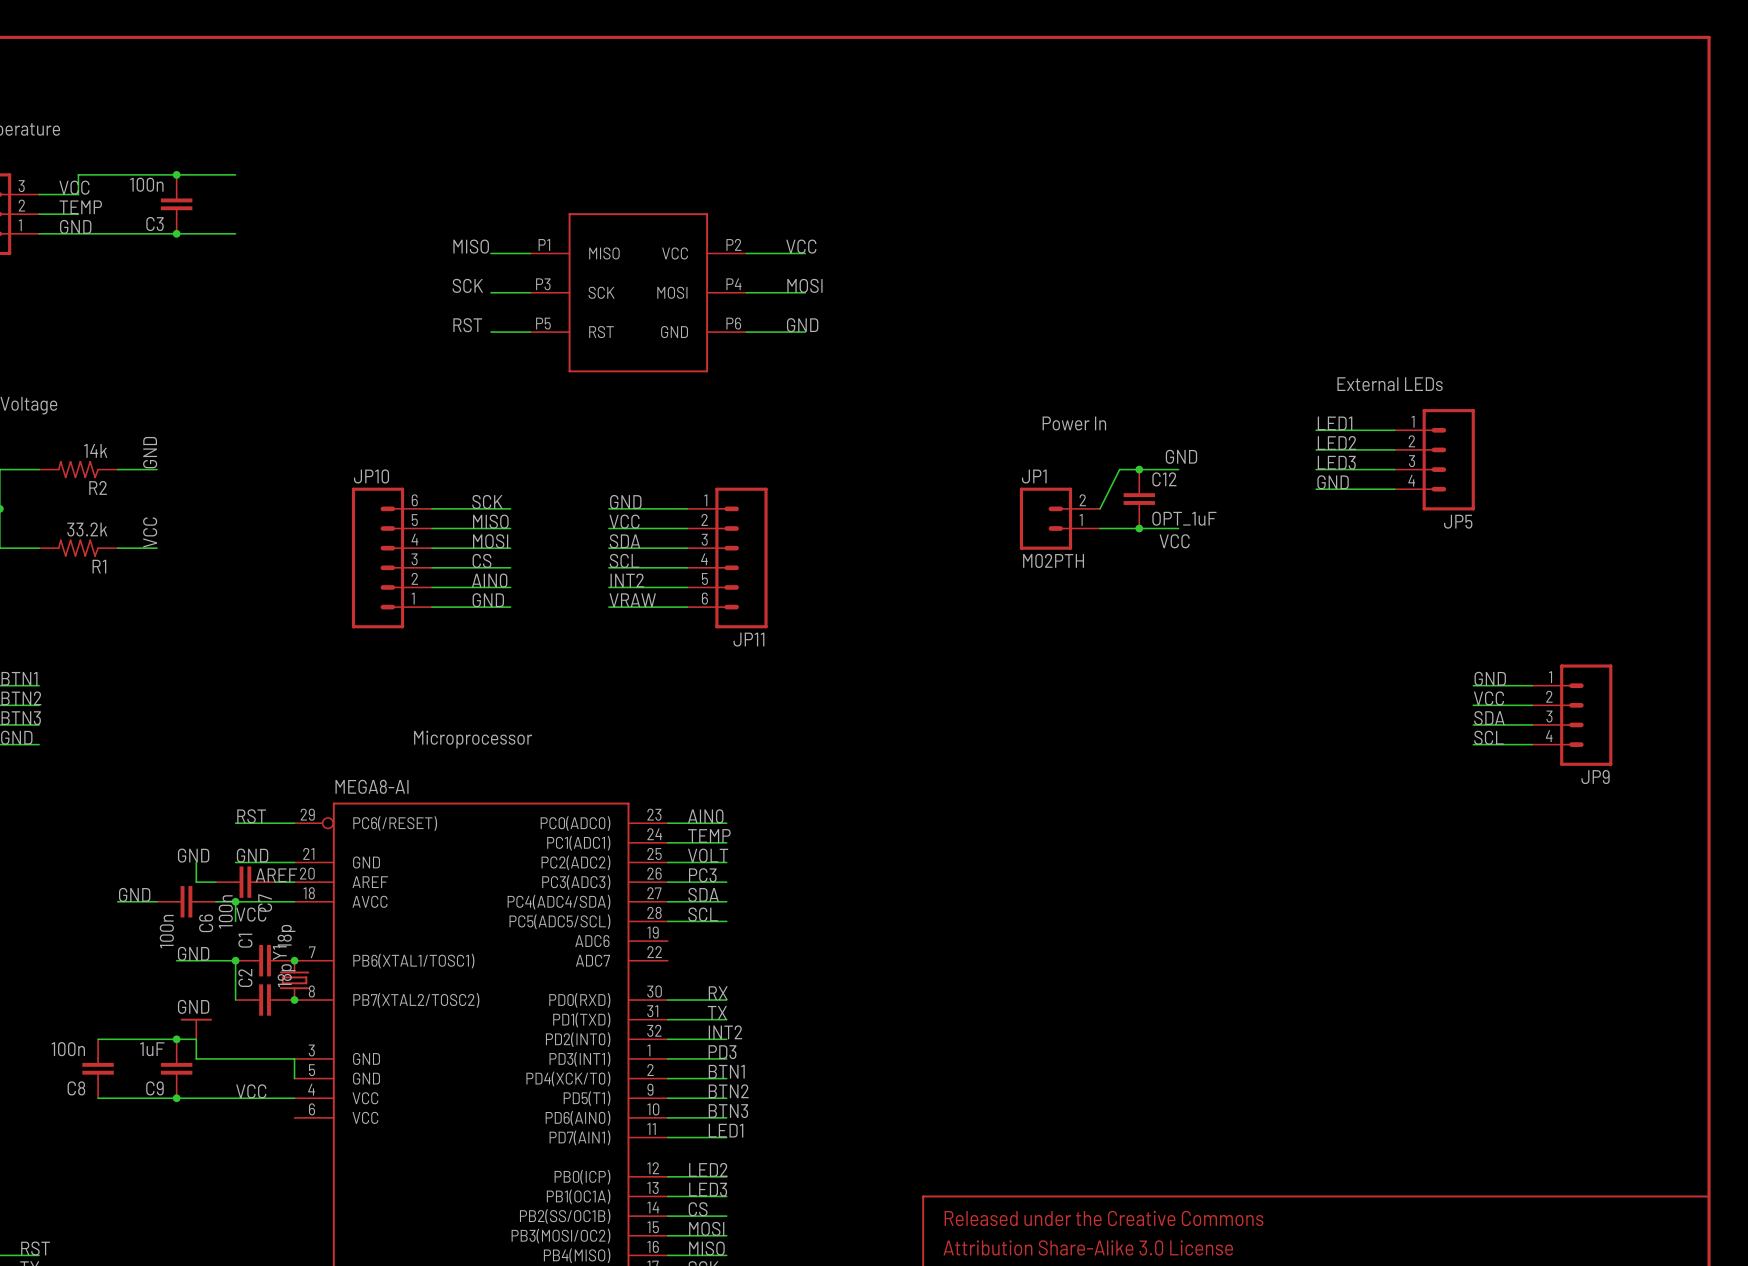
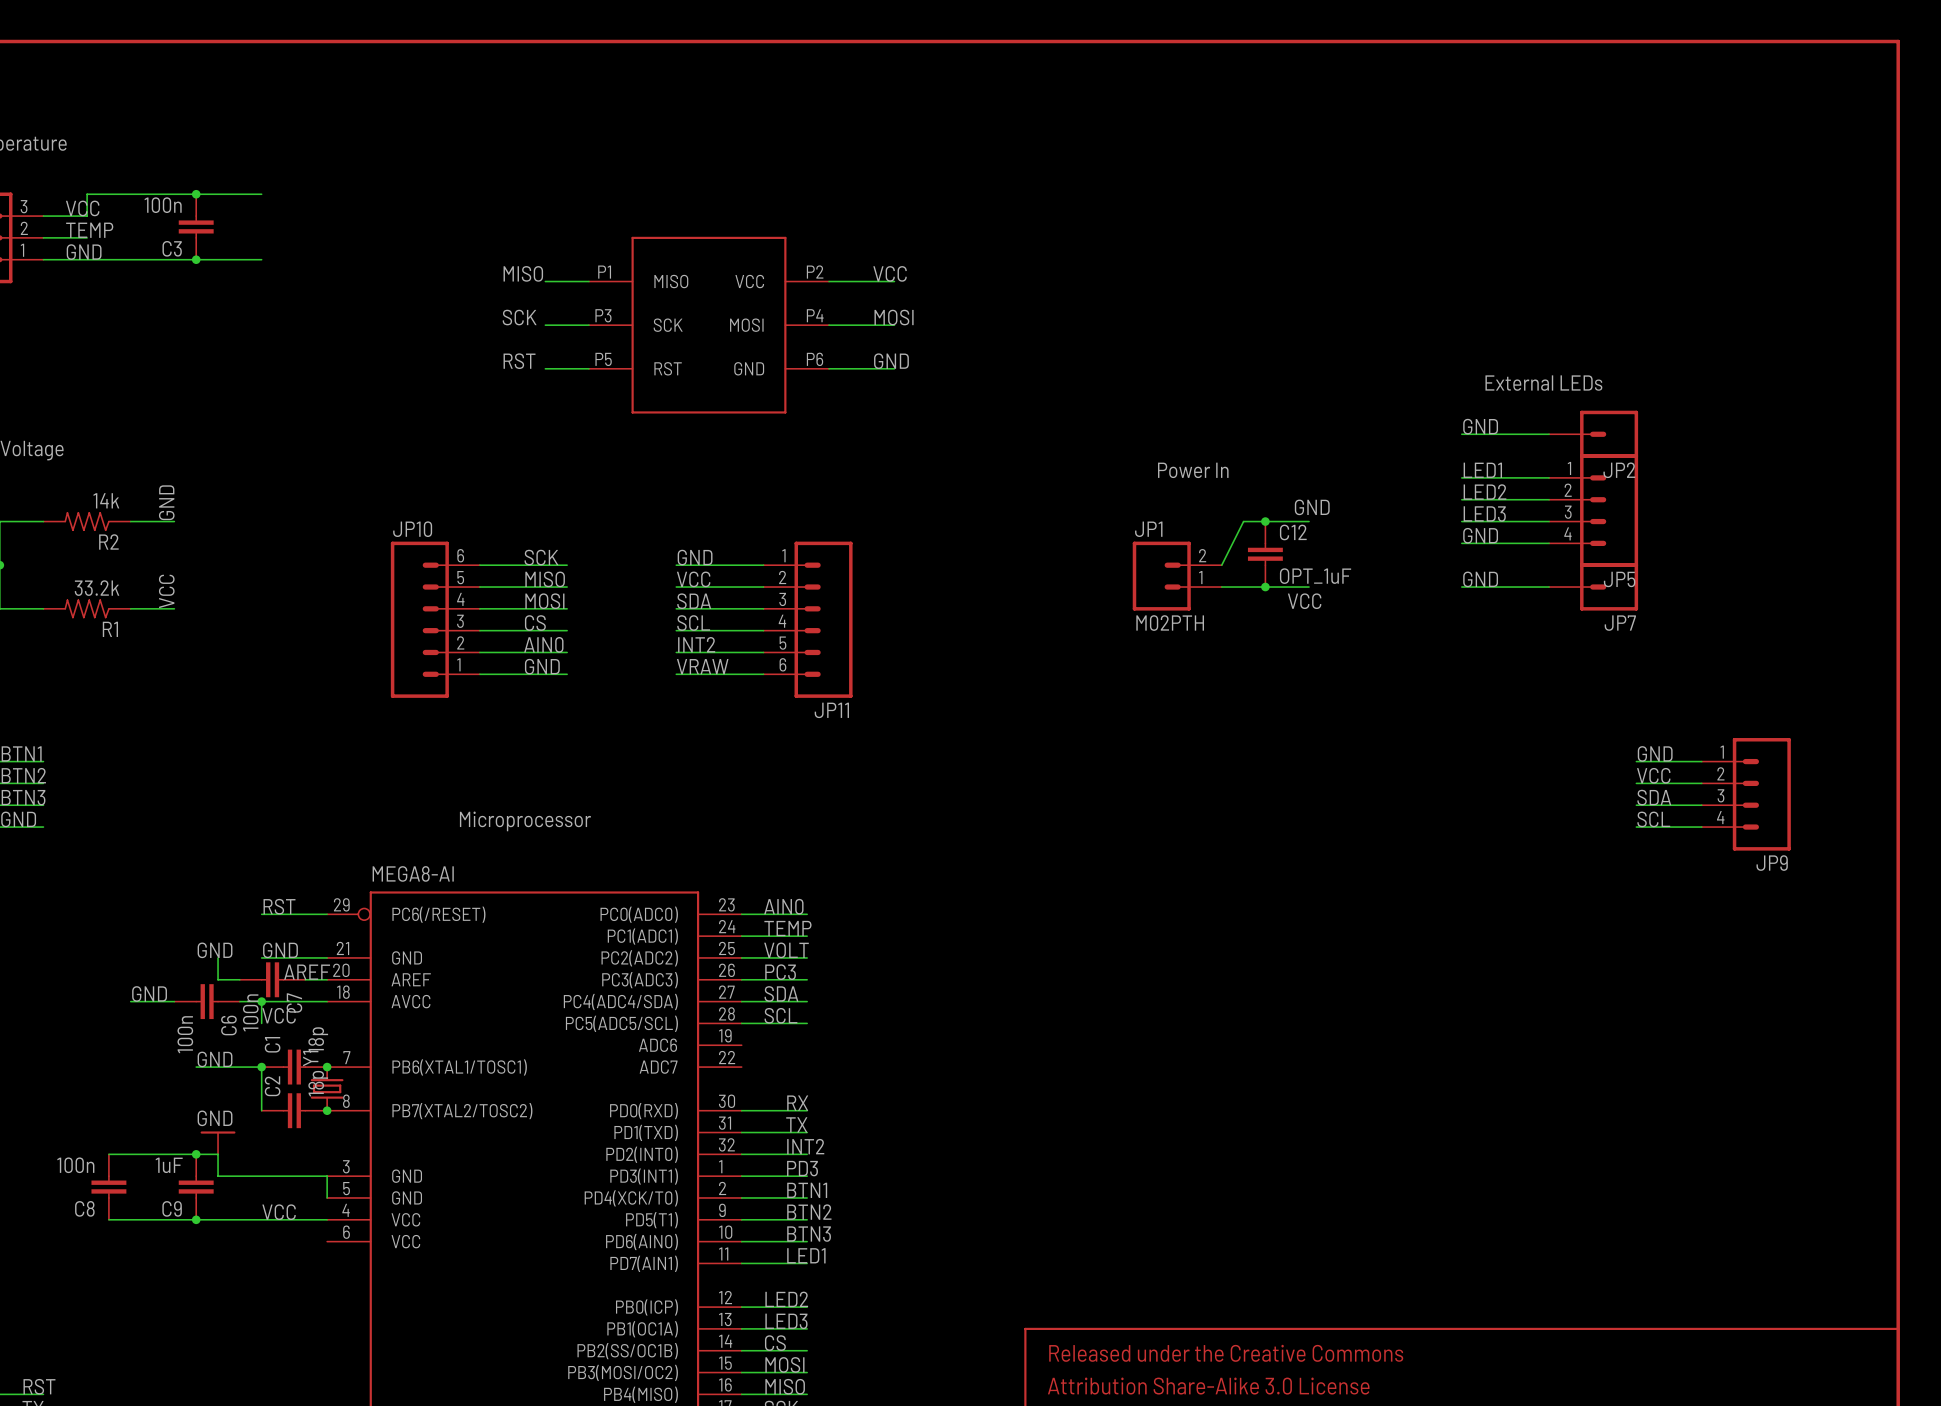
label: none -> GND (1480, 426)
text position: External LEDs (1390, 384) -> External LEDs (1543, 383)
wire: none -> (1461, 434) (1549, 434)
JP2: none -> (1593, 434)
label: none -> GND (1480, 579)
wire: none -> (1461, 587) (1549, 587)
JP7: none -> (1593, 587)

